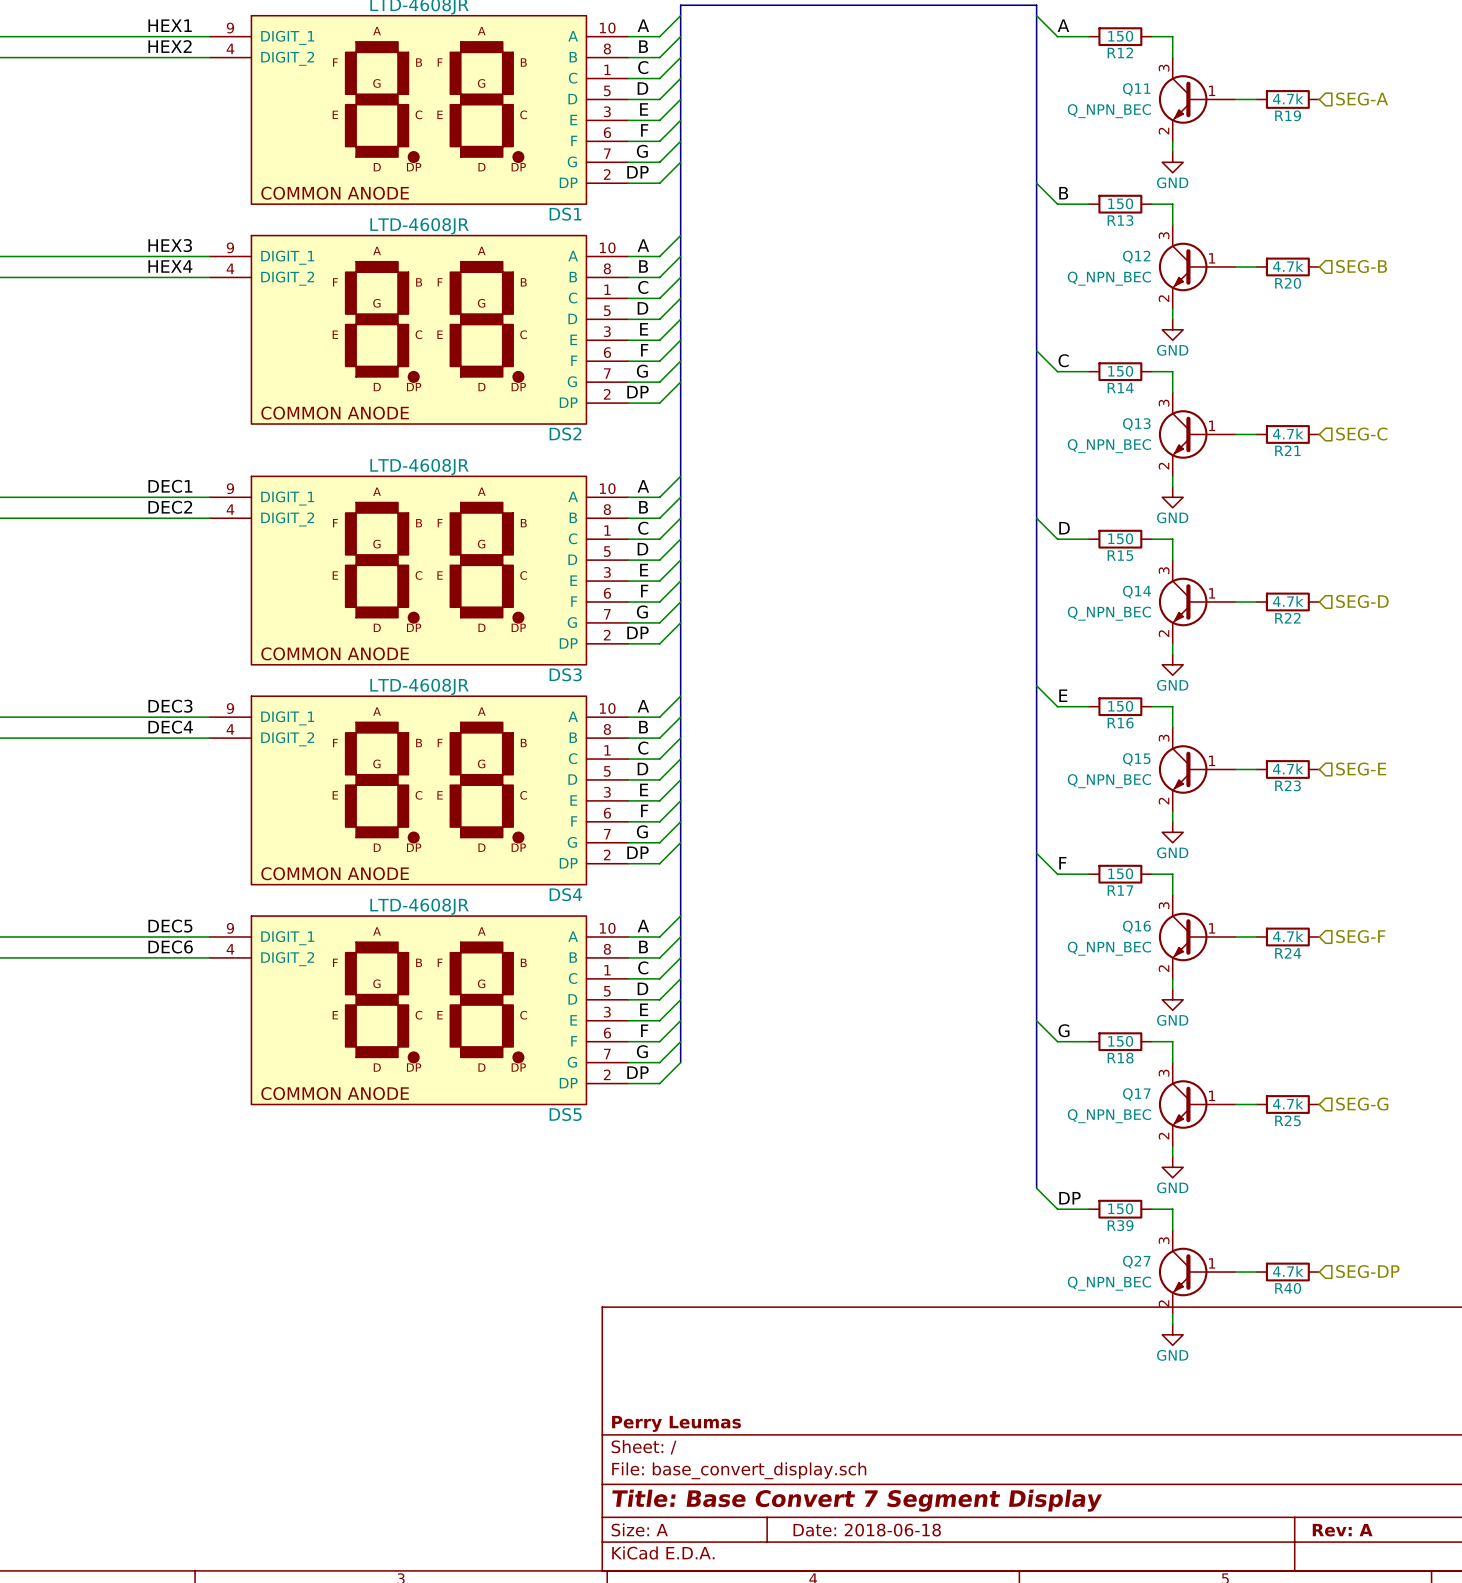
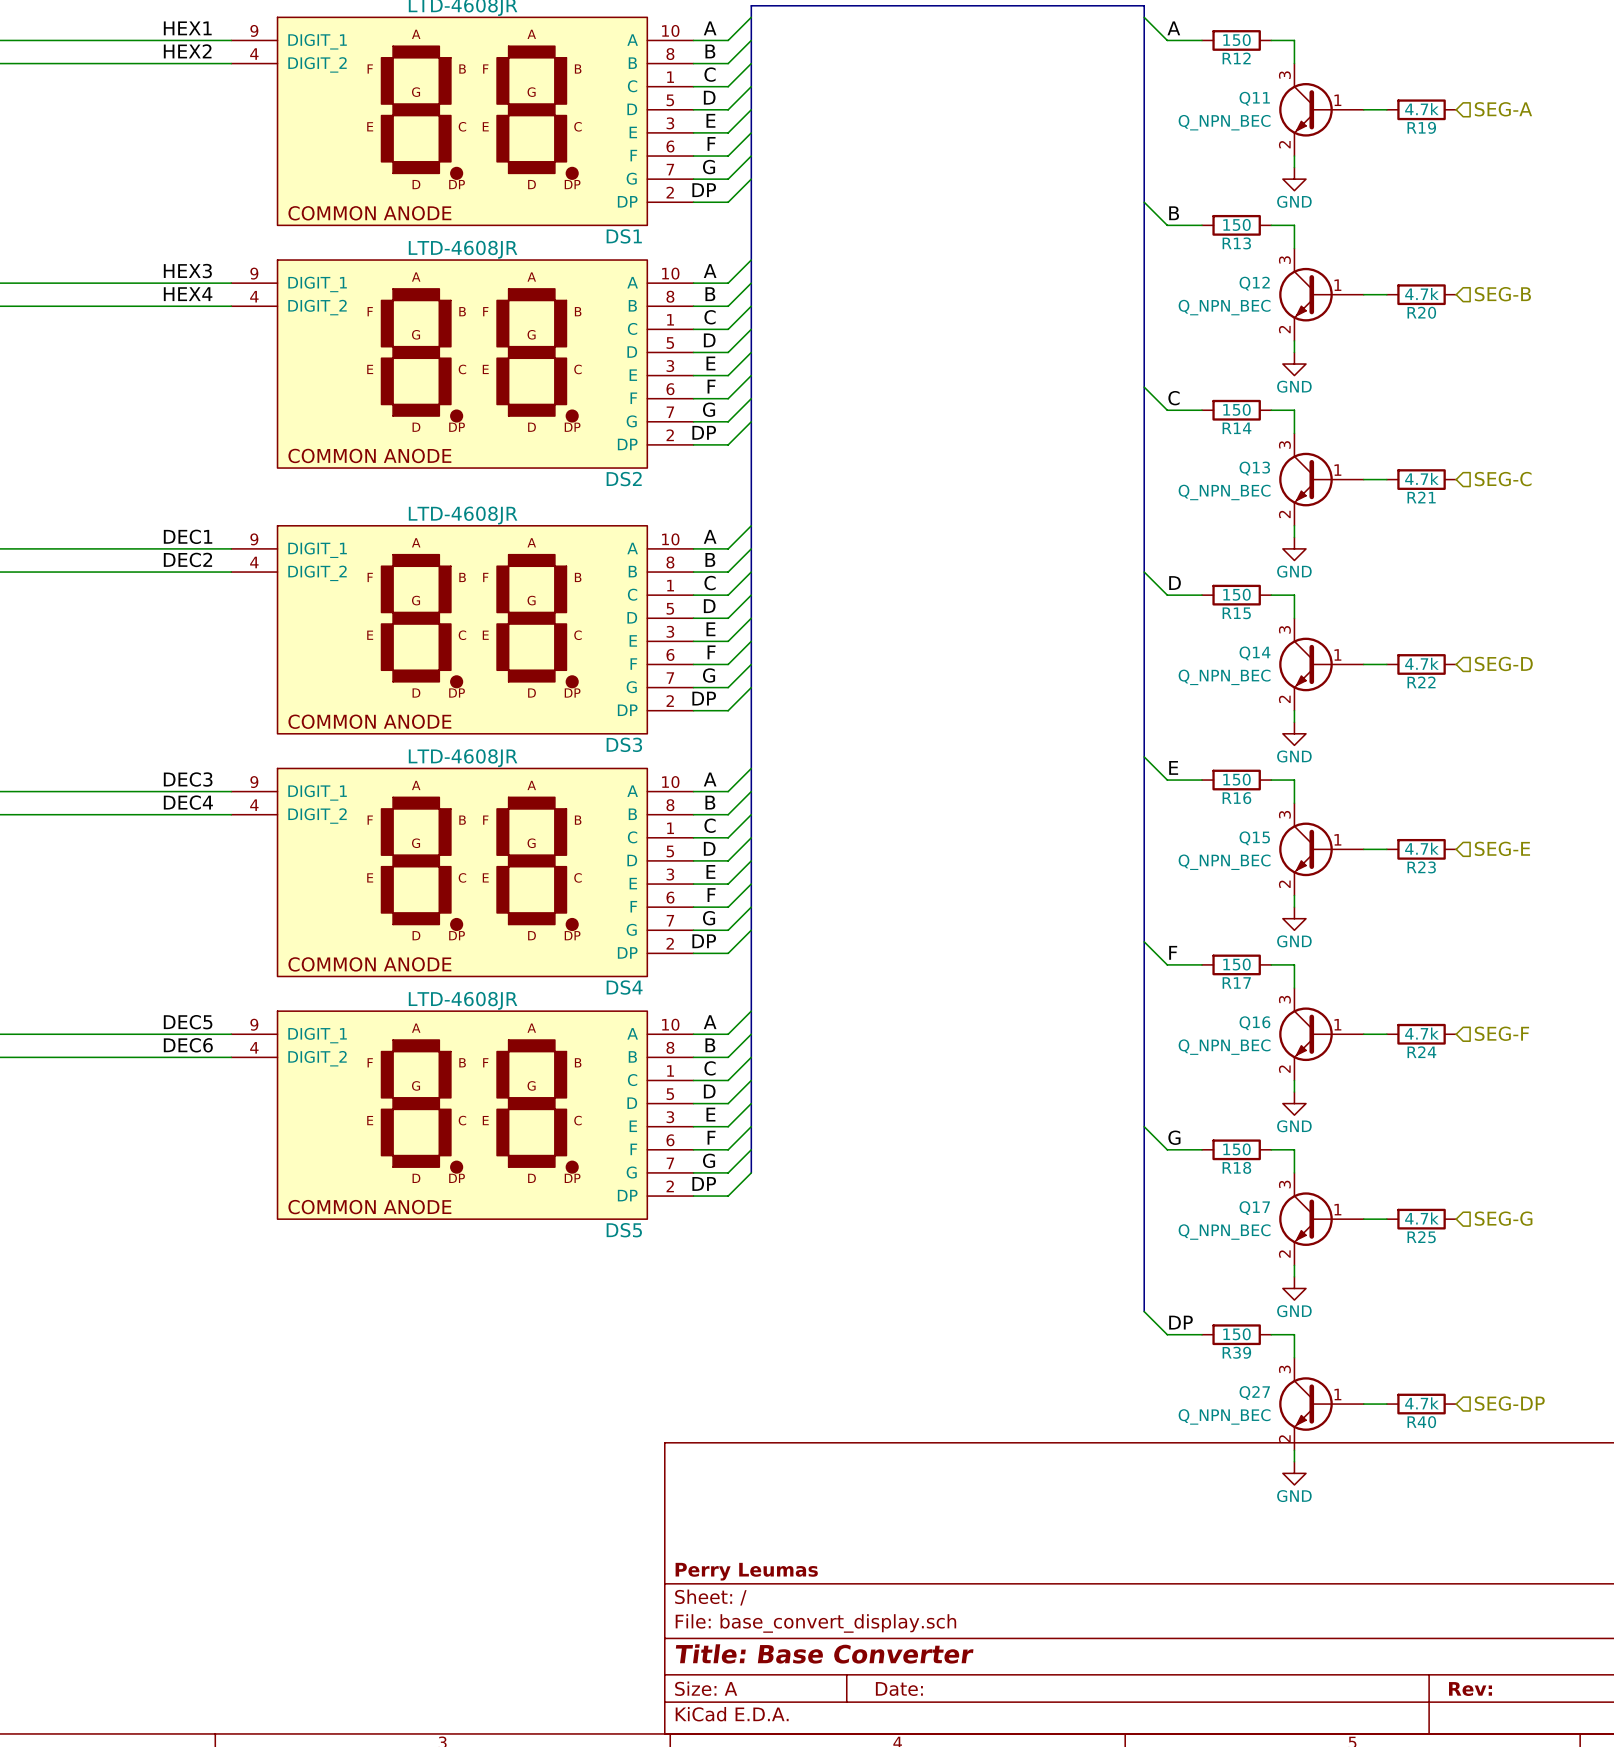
title block: Title: Base Convert 7 Segment Display (857, 1500) -> Title: Base Converter (824, 1653)
title block: Date: 2018-06-18 (867, 1530) -> Date: (899, 1689)
title block: Rev: A (1342, 1530) -> Rev: (1470, 1689)

